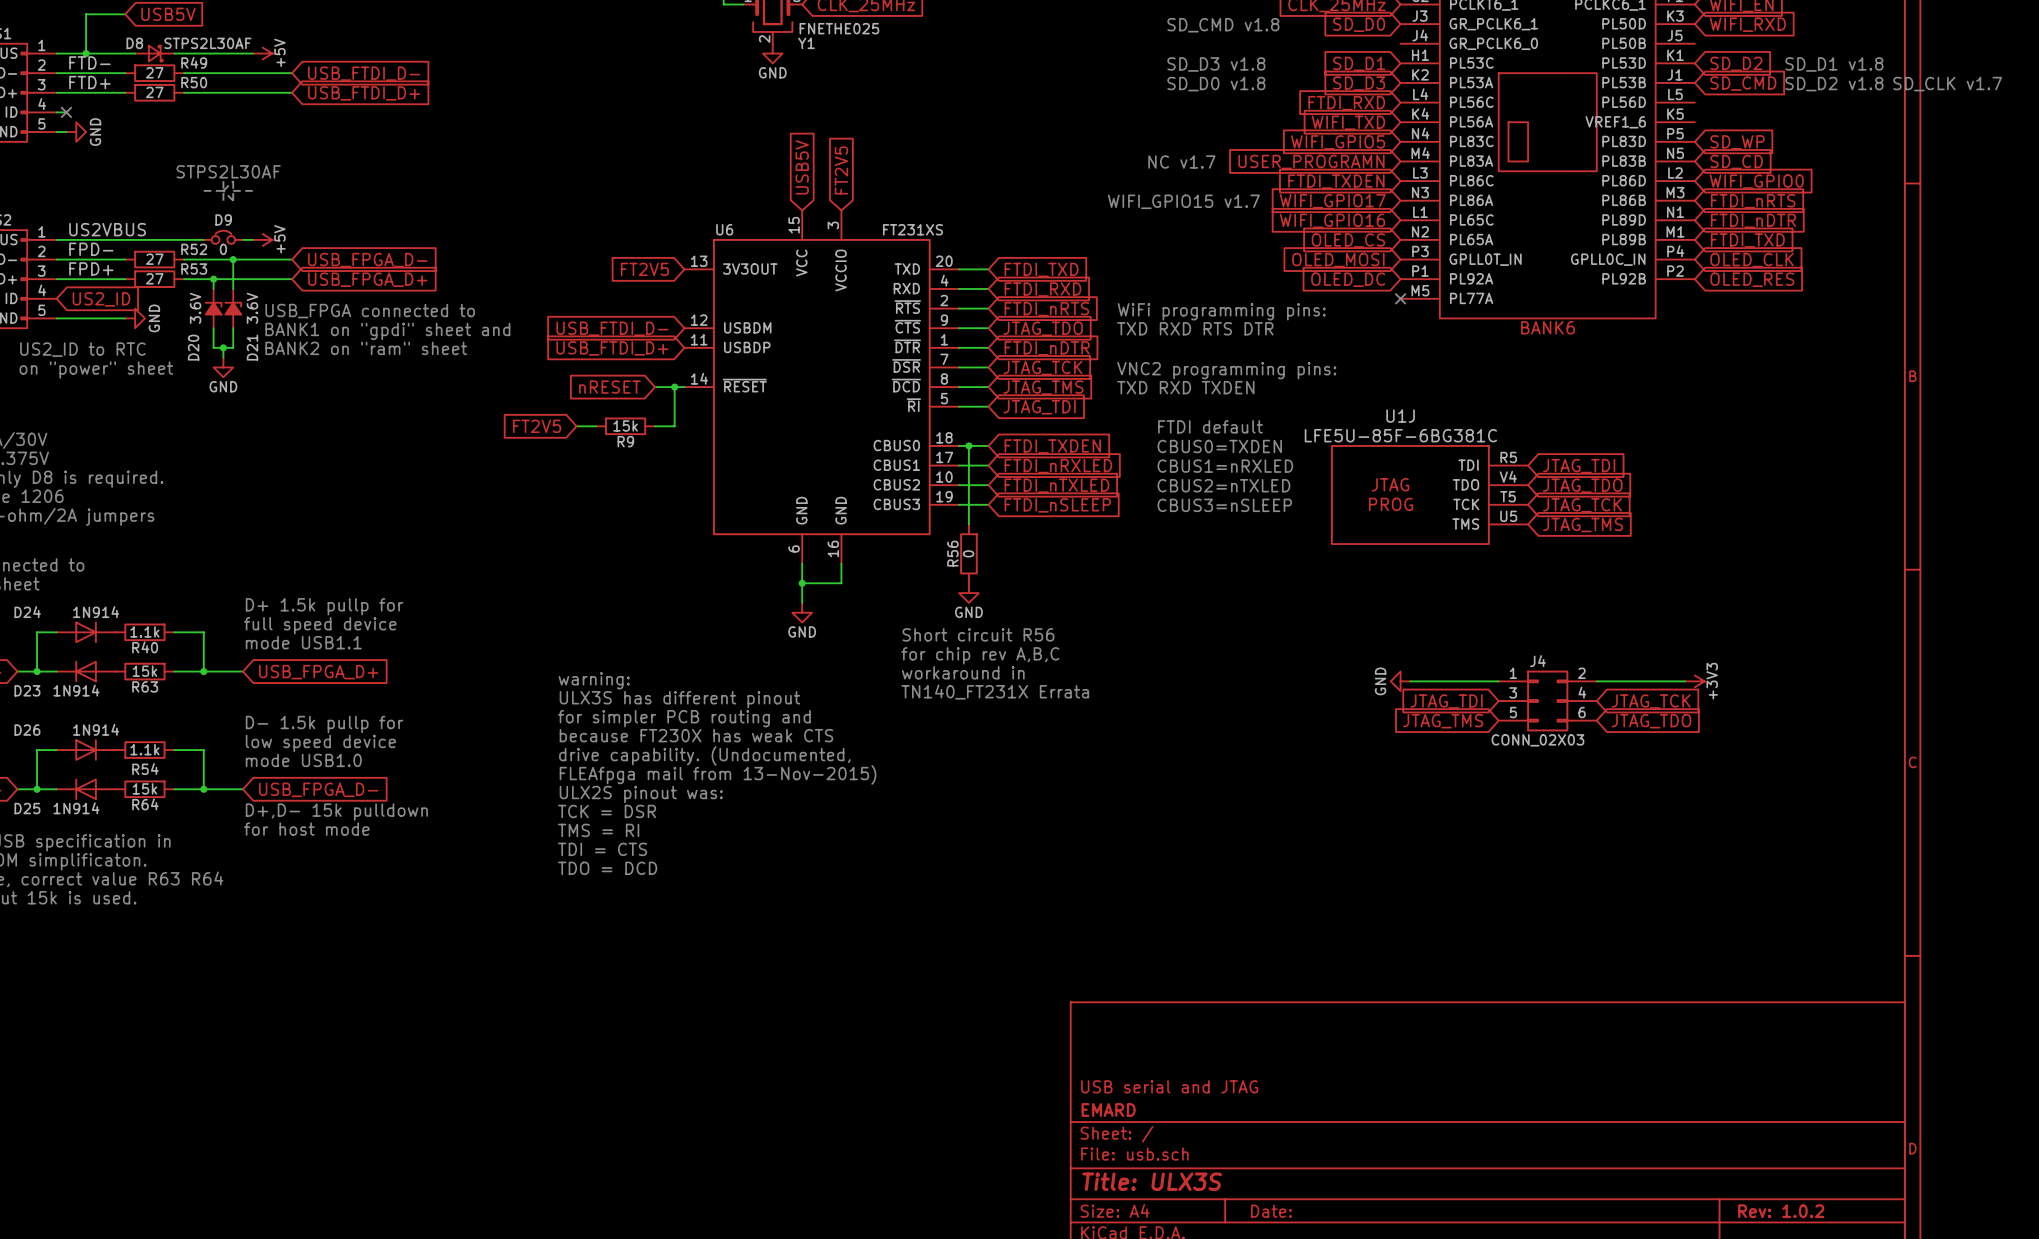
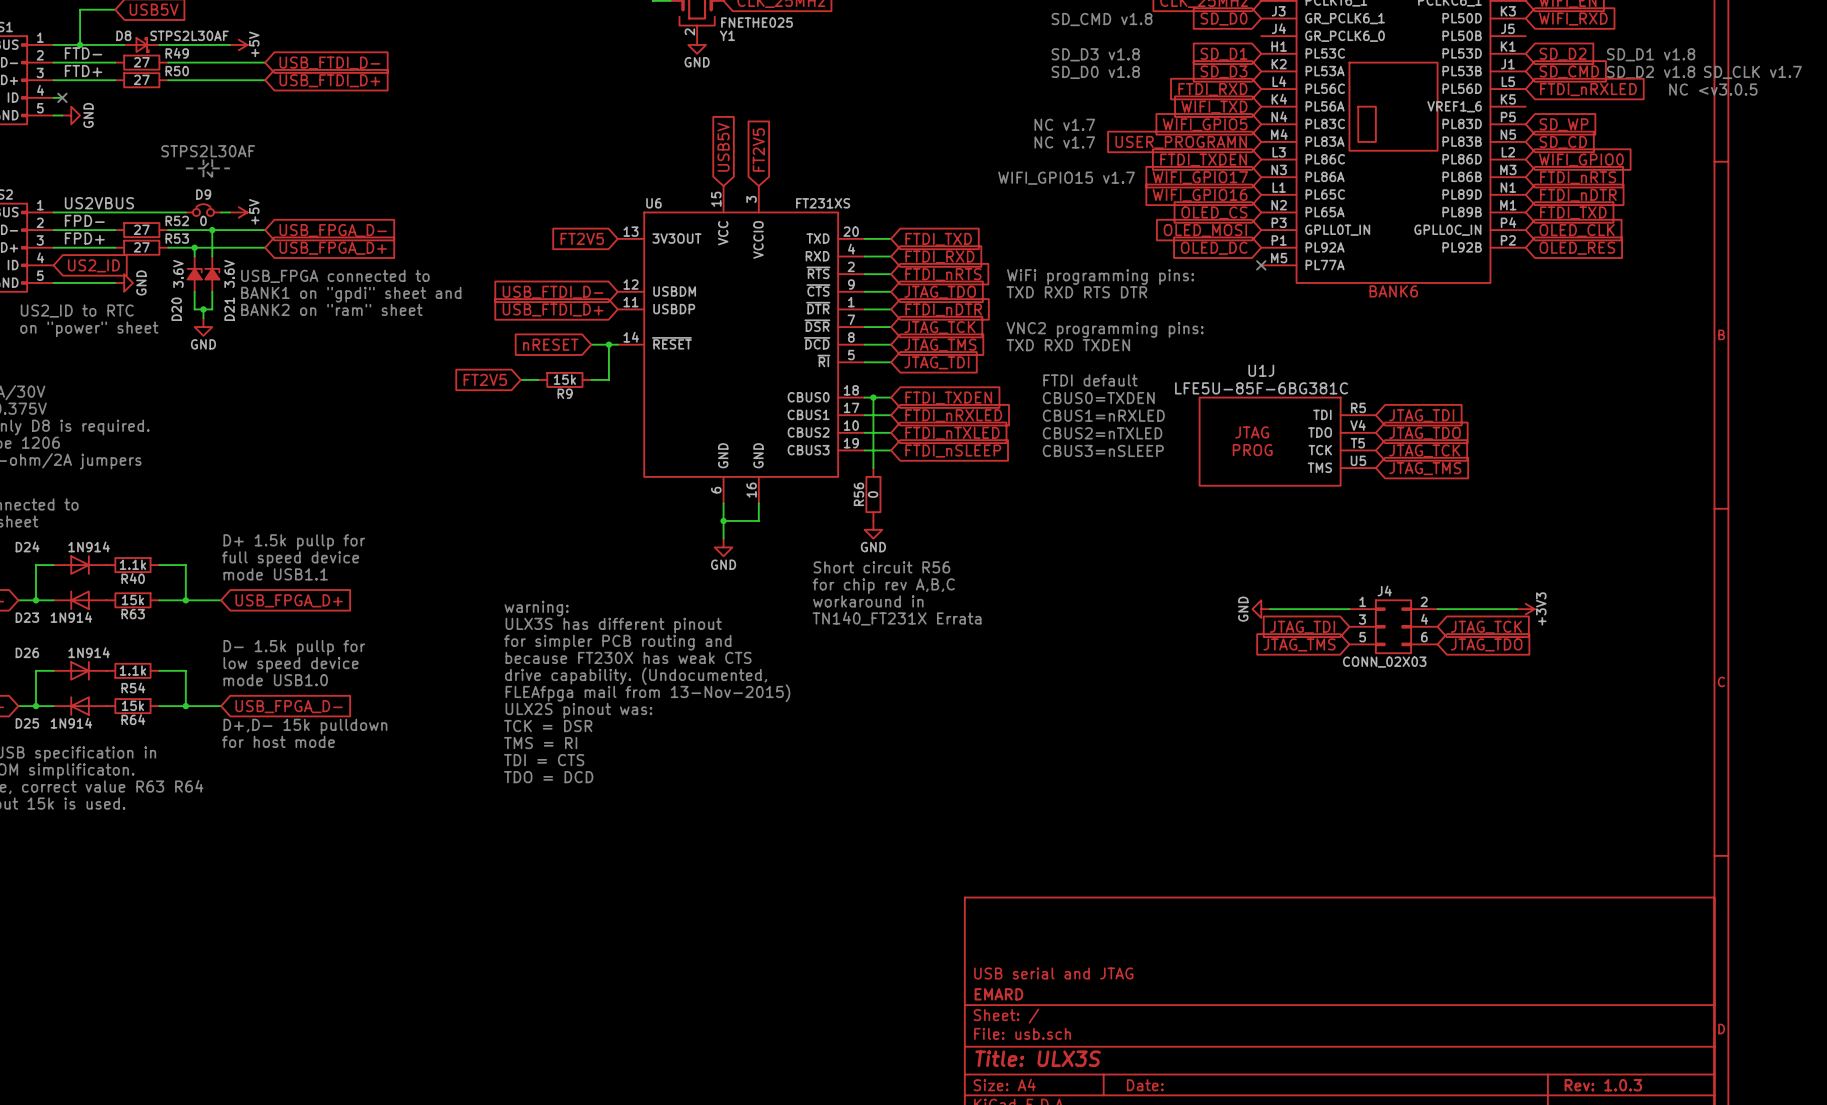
global label: none -> FTDI_nRXLED (1588, 89)
text: none -> NC <v3.0.5 (1713, 89)
text: none -> NC v1.7 (1064, 124)
title block: Rev: 1.0.2 (1781, 1211) -> Rev: 1.0.3 (1603, 1085)

